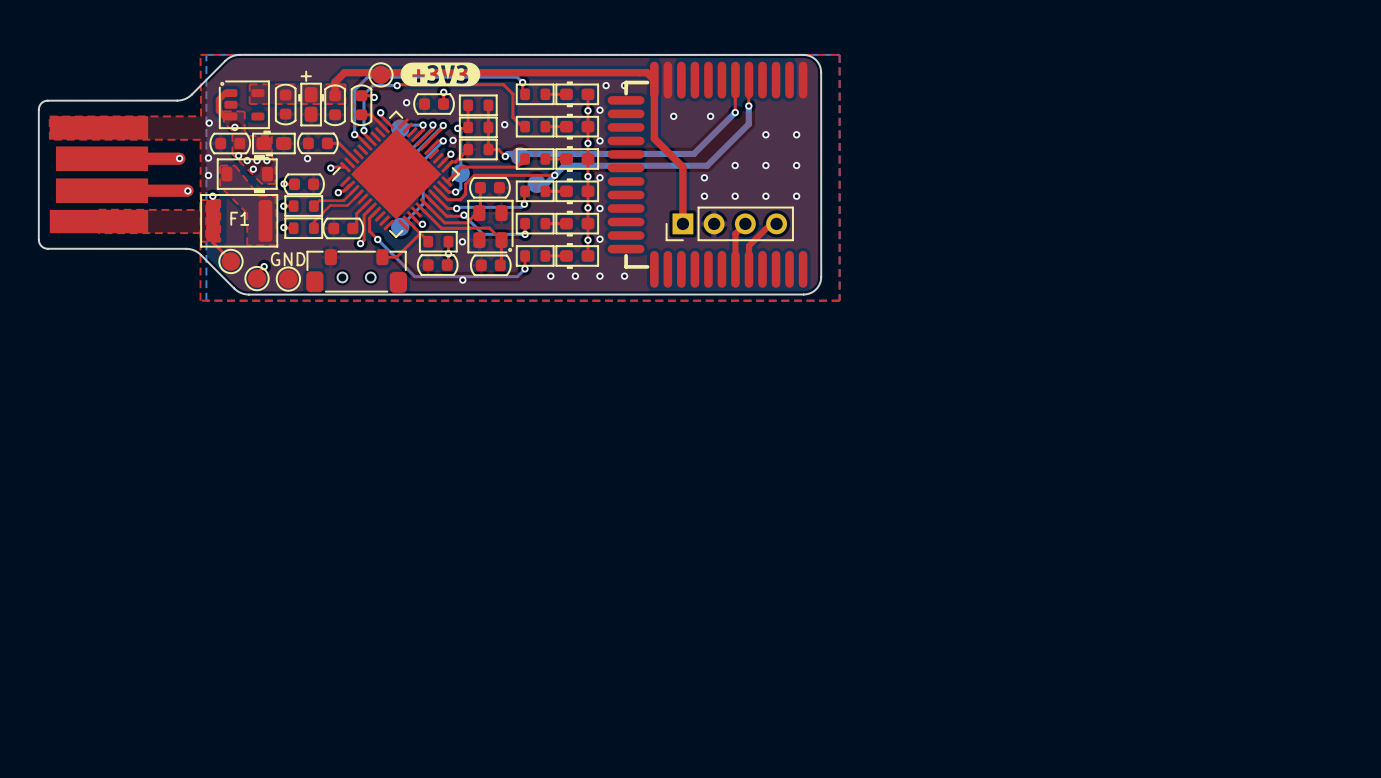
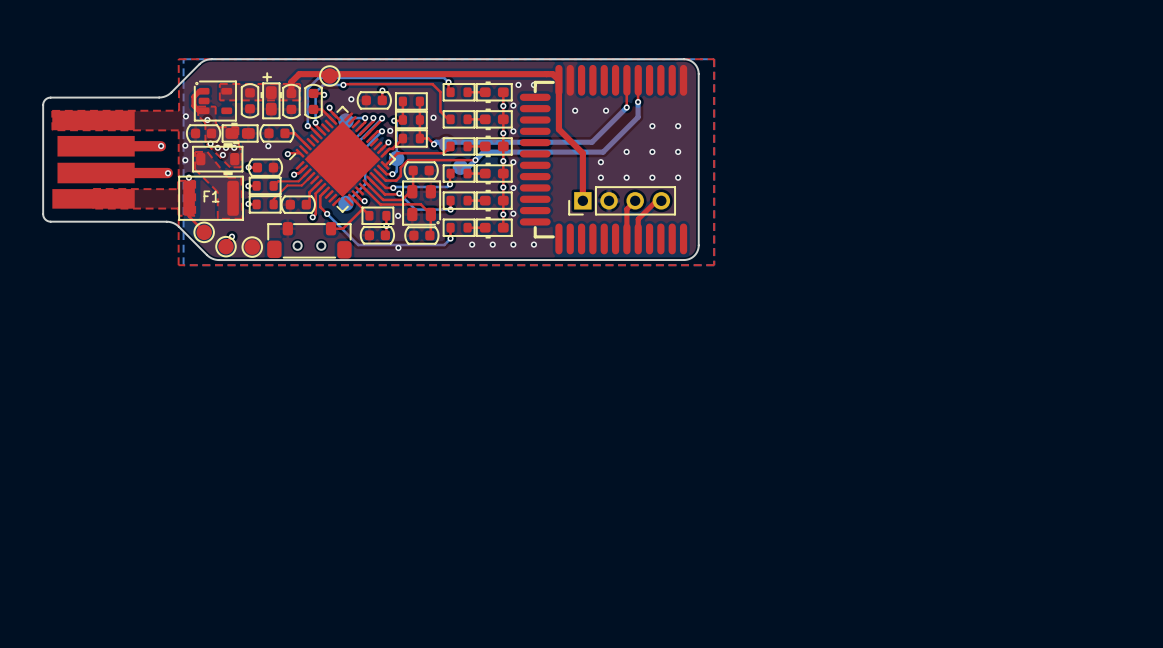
drawing: [400, 62, 481, 87] -> none
text: GND (288, 259) -> none

